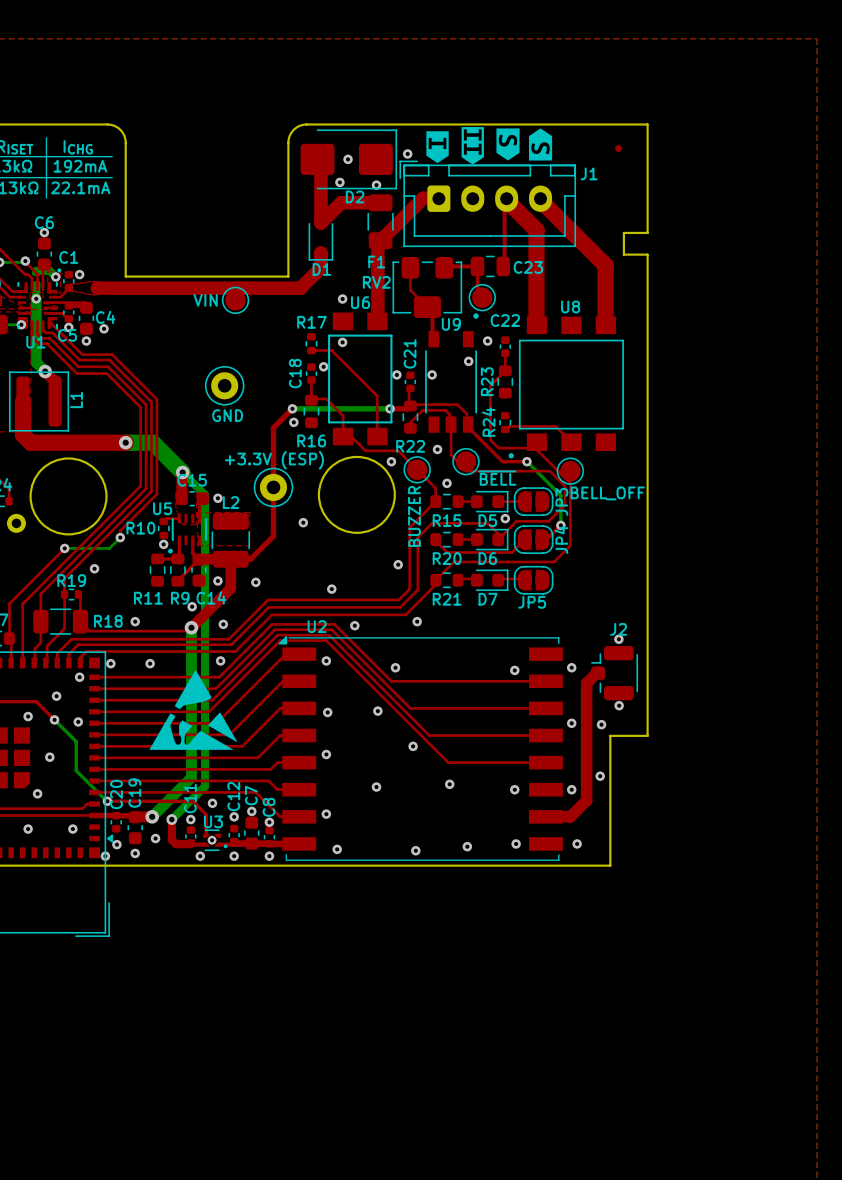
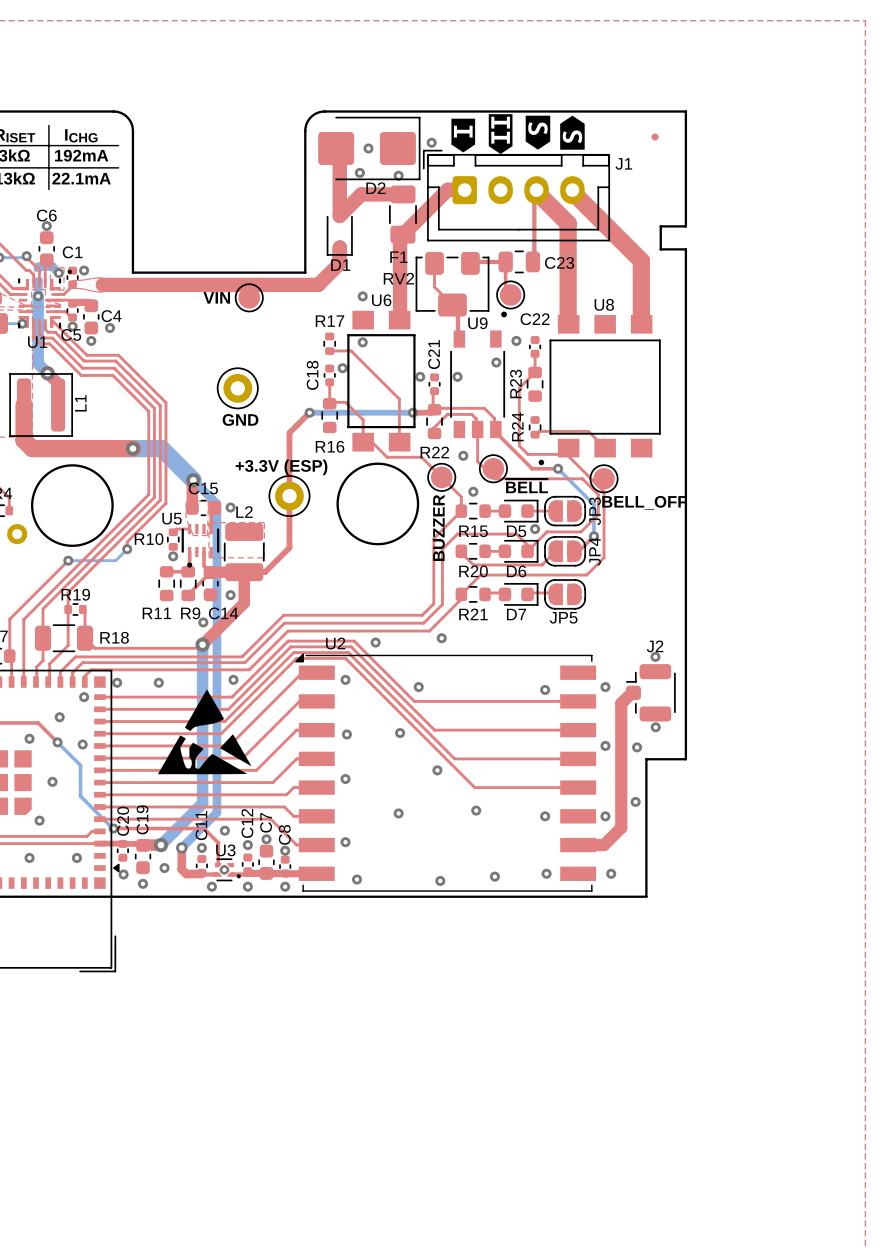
U1 footprint: [17, 268, 62, 330] -> [18, 269, 72, 329]
via: (293, 422) -> none
via: (391, 461) -> none
U5 footprint: [168, 513, 208, 554] -> [181, 523, 220, 568]
via: (303, 522) -> none
via: (398, 564) -> none
via: (94, 568) -> none
via: (255, 582) -> none
via: (331, 589) -> none
via: (135, 621) -> none
via: (223, 624) -> none
via: (105, 856) -> none

